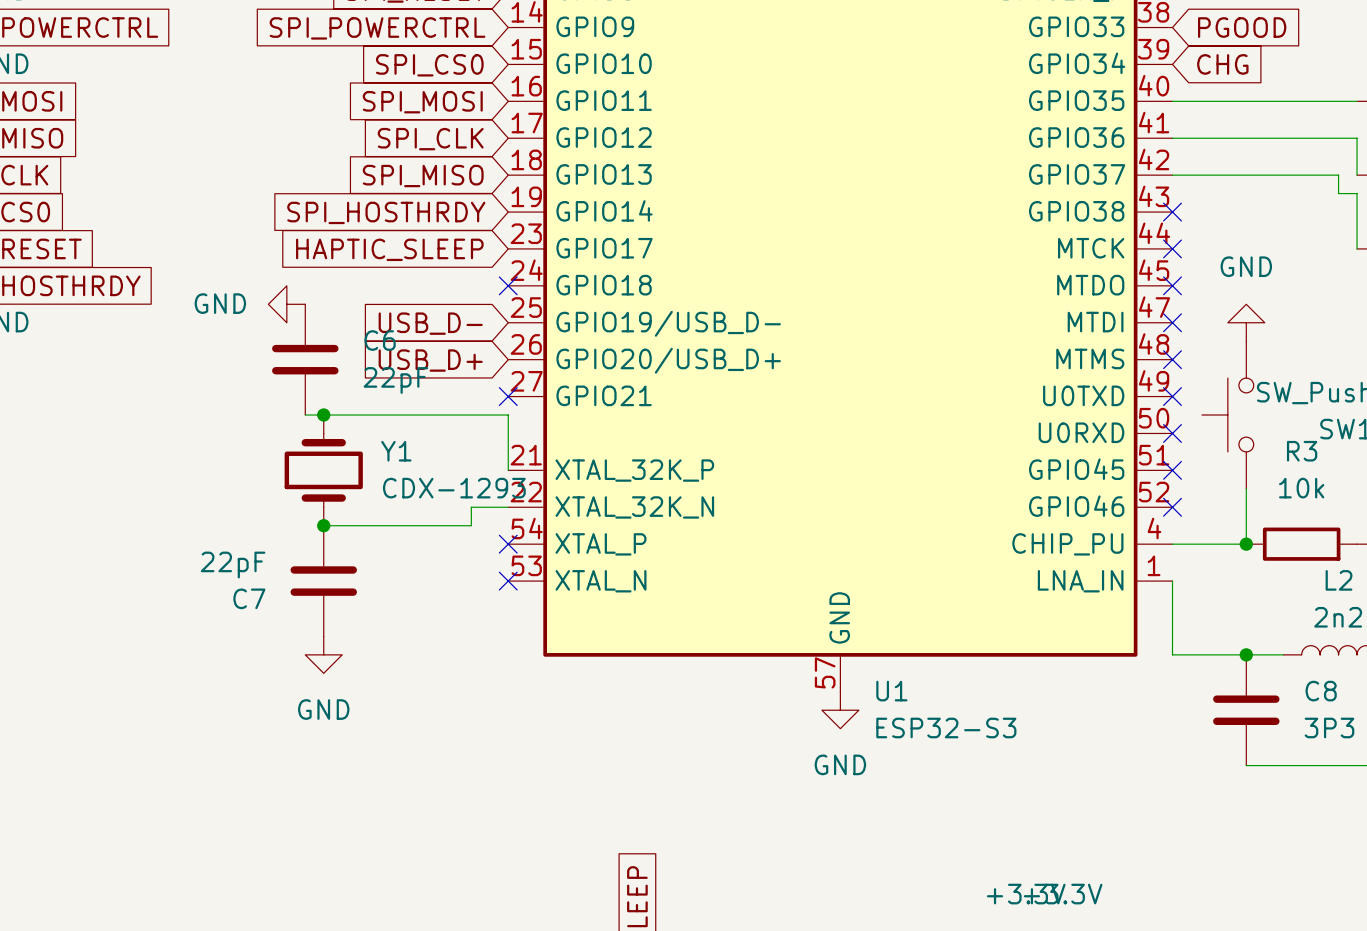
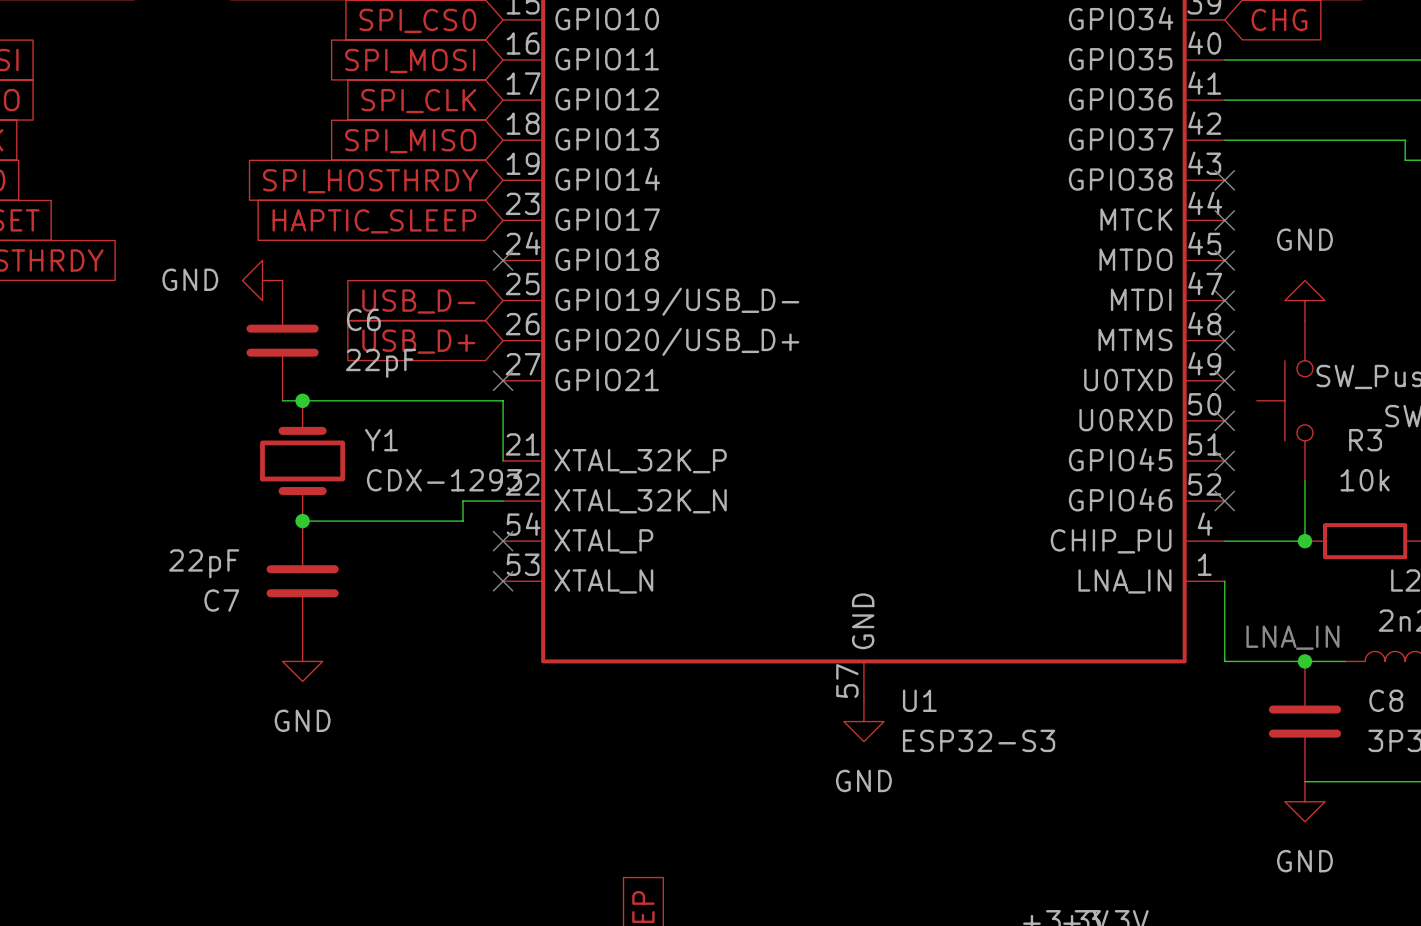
text: none -> LNA_IN (1292, 637)
power symbol: none -> GND (1304, 801)

